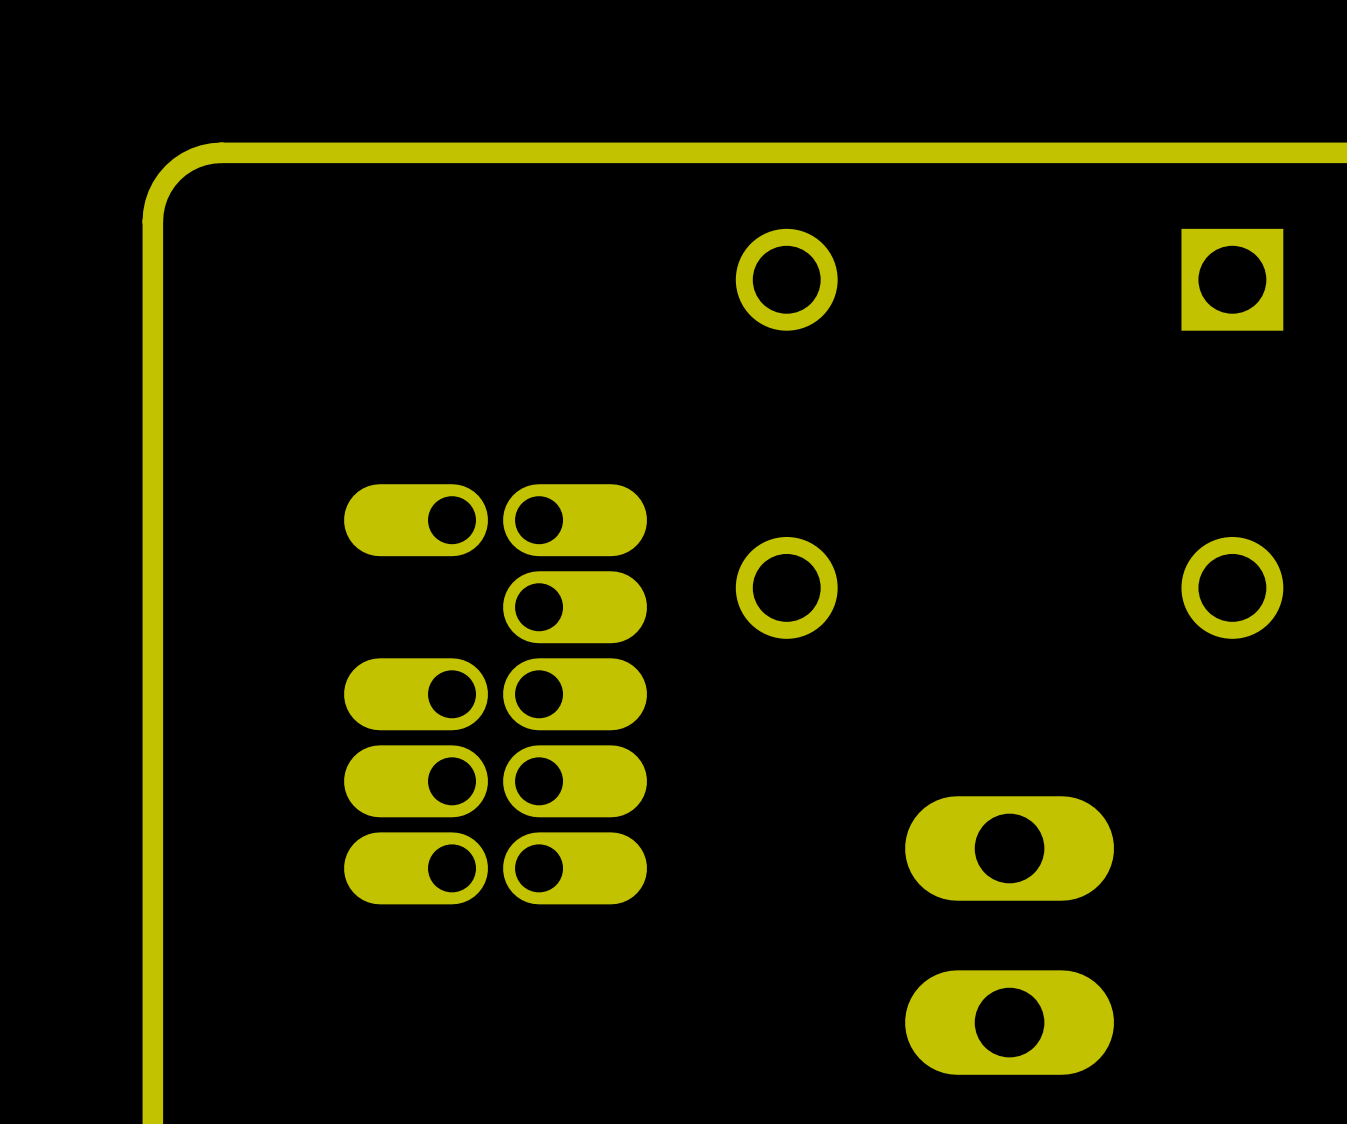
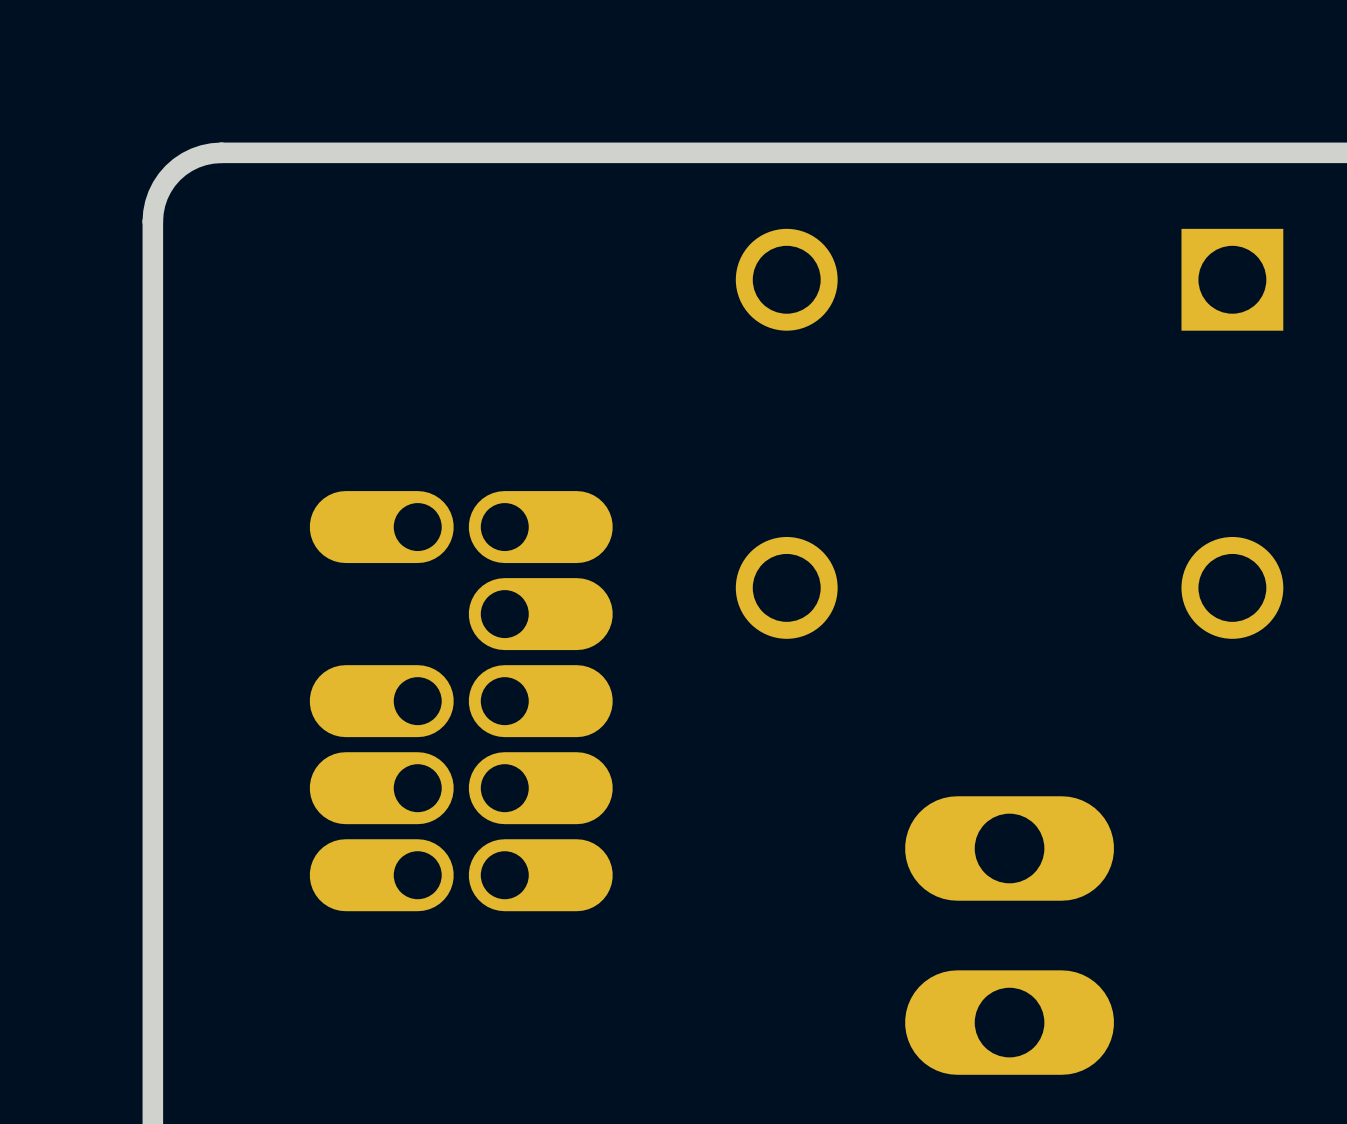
part position: (495, 694) -> (461, 701)

